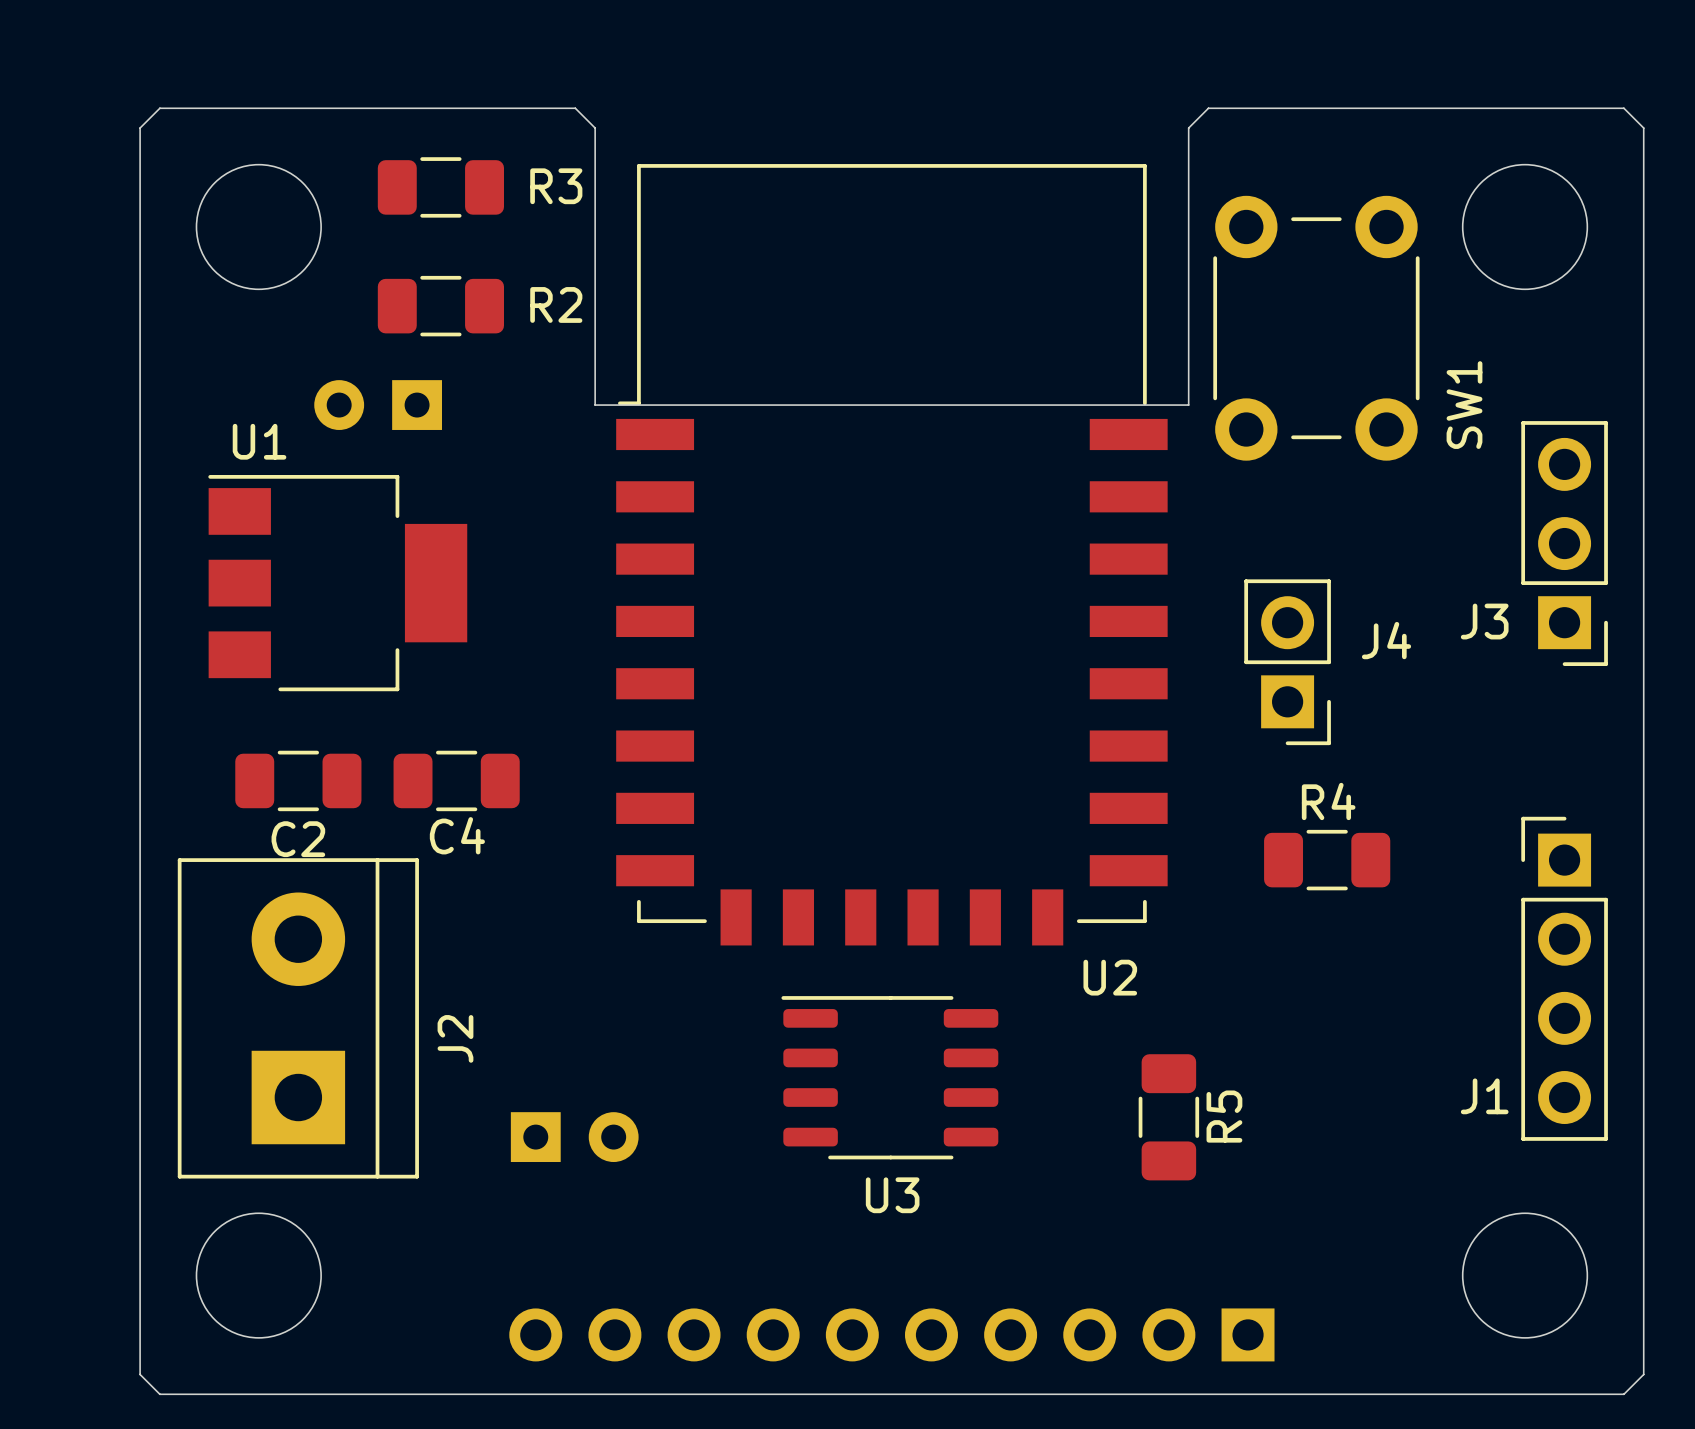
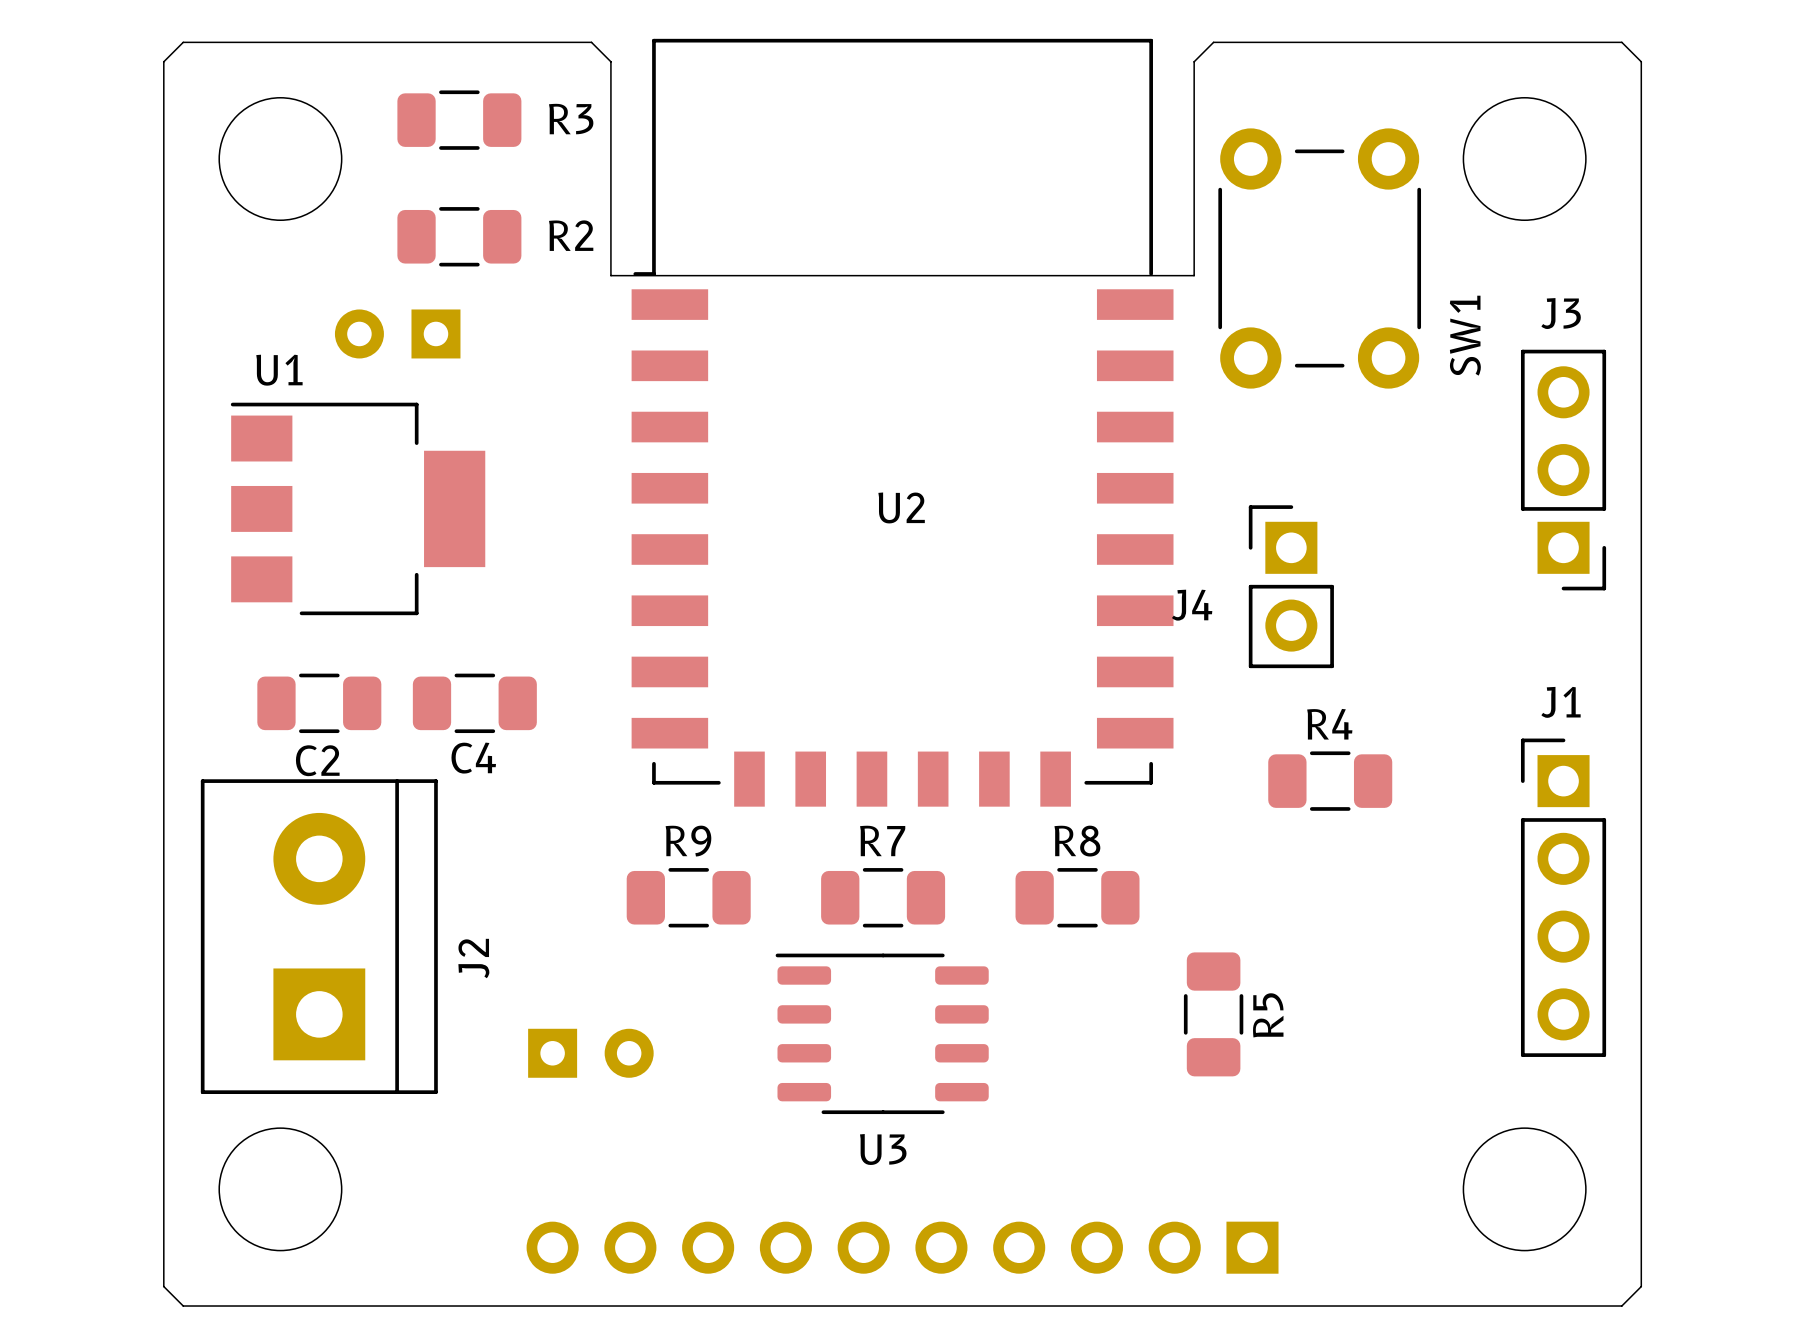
board edge: (595, 345) (595, 405) (1188, 405) (1188, 345) -> (610, 275) (1194, 275)
U2 position: (891, 554) -> (902, 422)
J3 name position: J3 (1484, 621) -> J3 (1561, 313)
J4 rotation: 0° (1287, 662) -> 180° (1291, 586)
U2 name position: U2 (1110, 977) -> U2 (901, 507)
R9: none -> (688, 897)
R7: none -> (883, 897)
R8: none -> (1077, 897)
U3 position: (889, 1077) -> (882, 1033)
J1 name position: J1 (1484, 1096) -> J1 (1561, 702)
R5 position: (1168, 1117) -> (1213, 1014)

